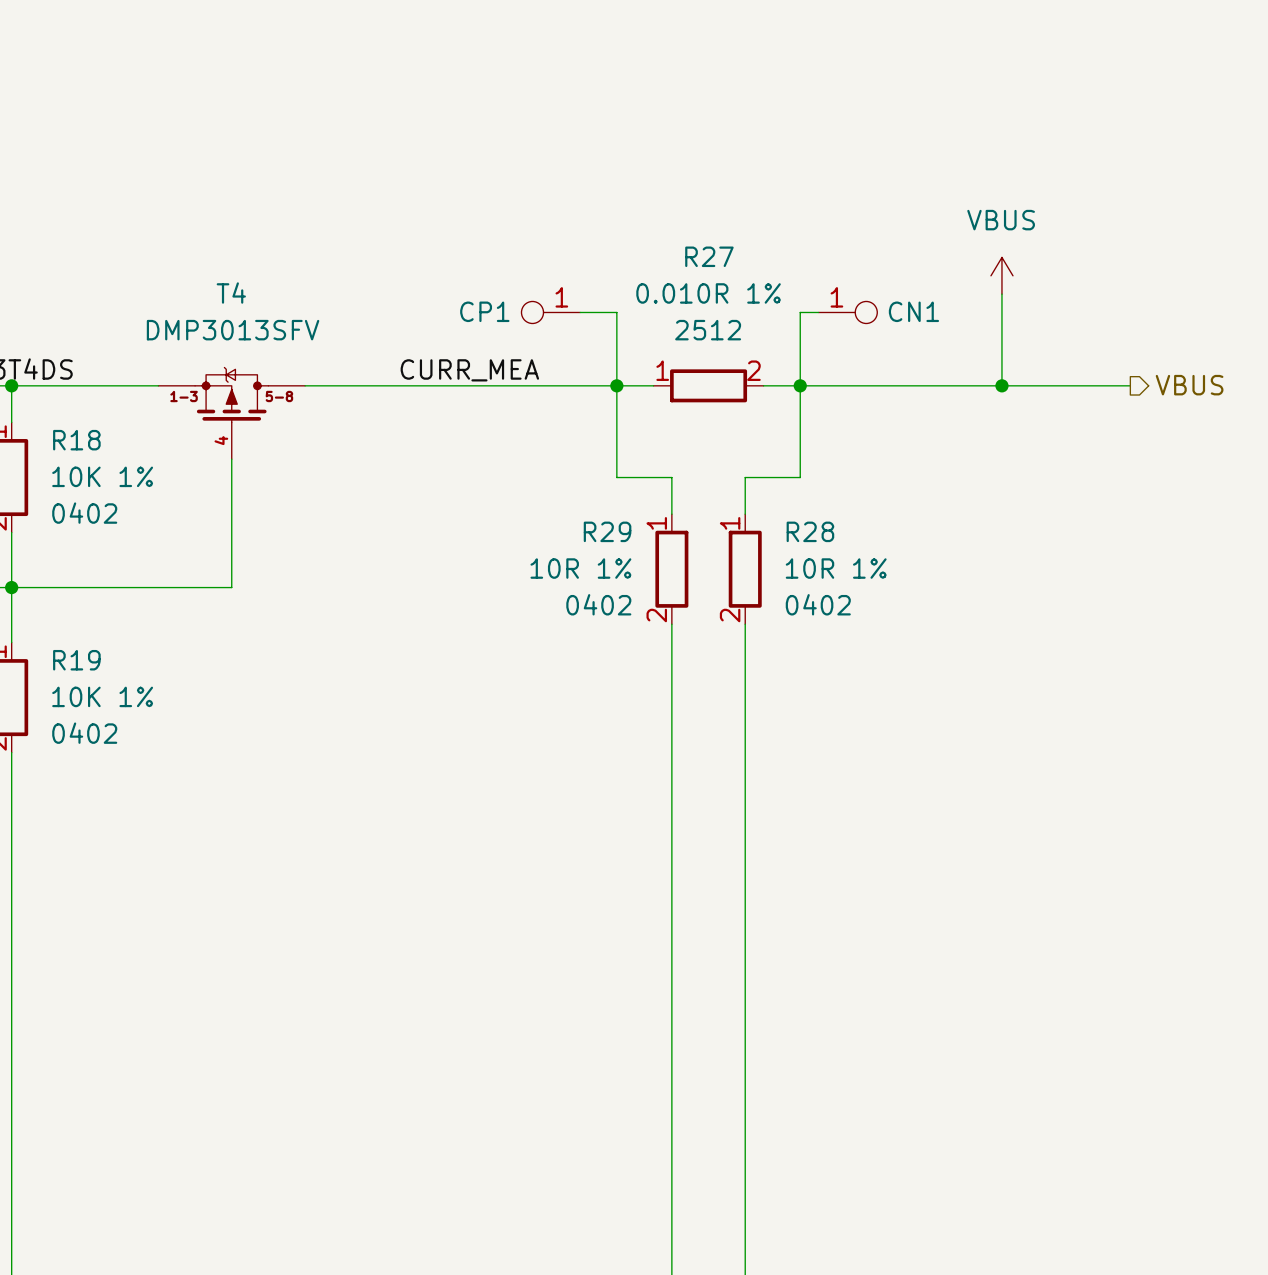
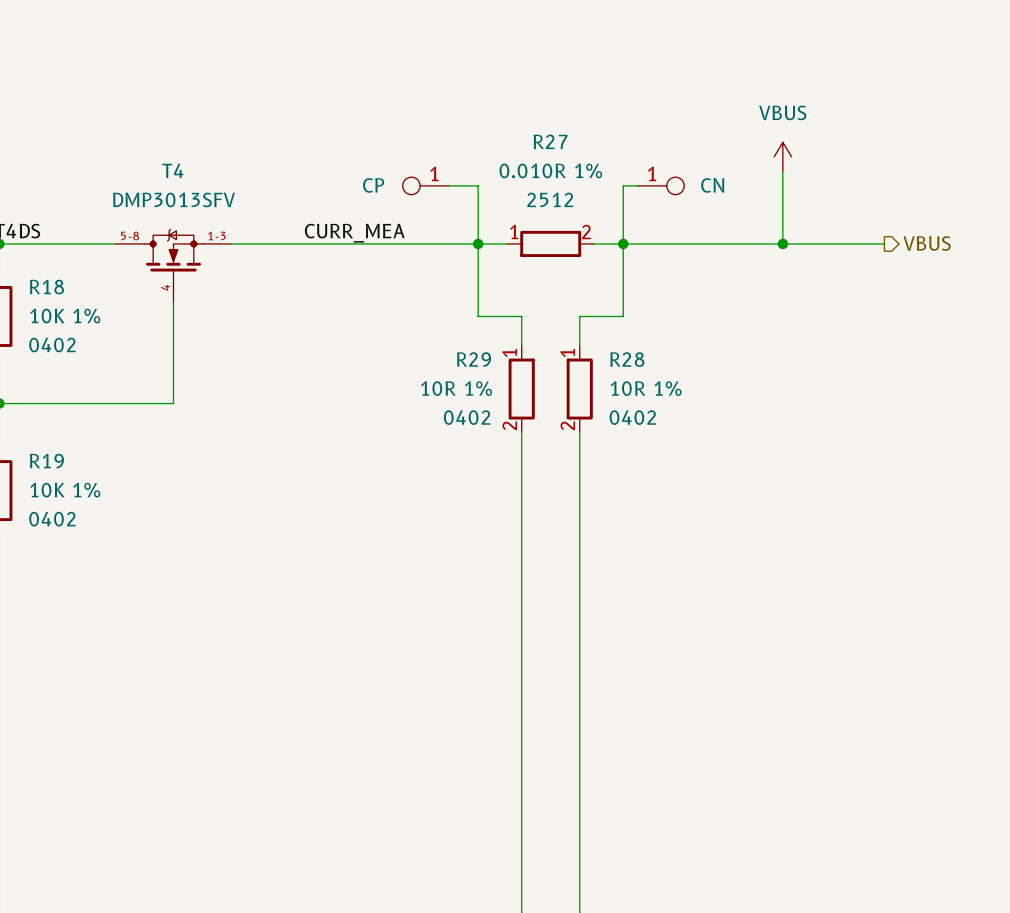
CP1 name: CP1 (484, 311) -> CP (373, 185)
CN1 name: CN1 (913, 311) -> CN (712, 185)
T4 symbol: [158, 367, 306, 460] -> [115, 229, 232, 302]

